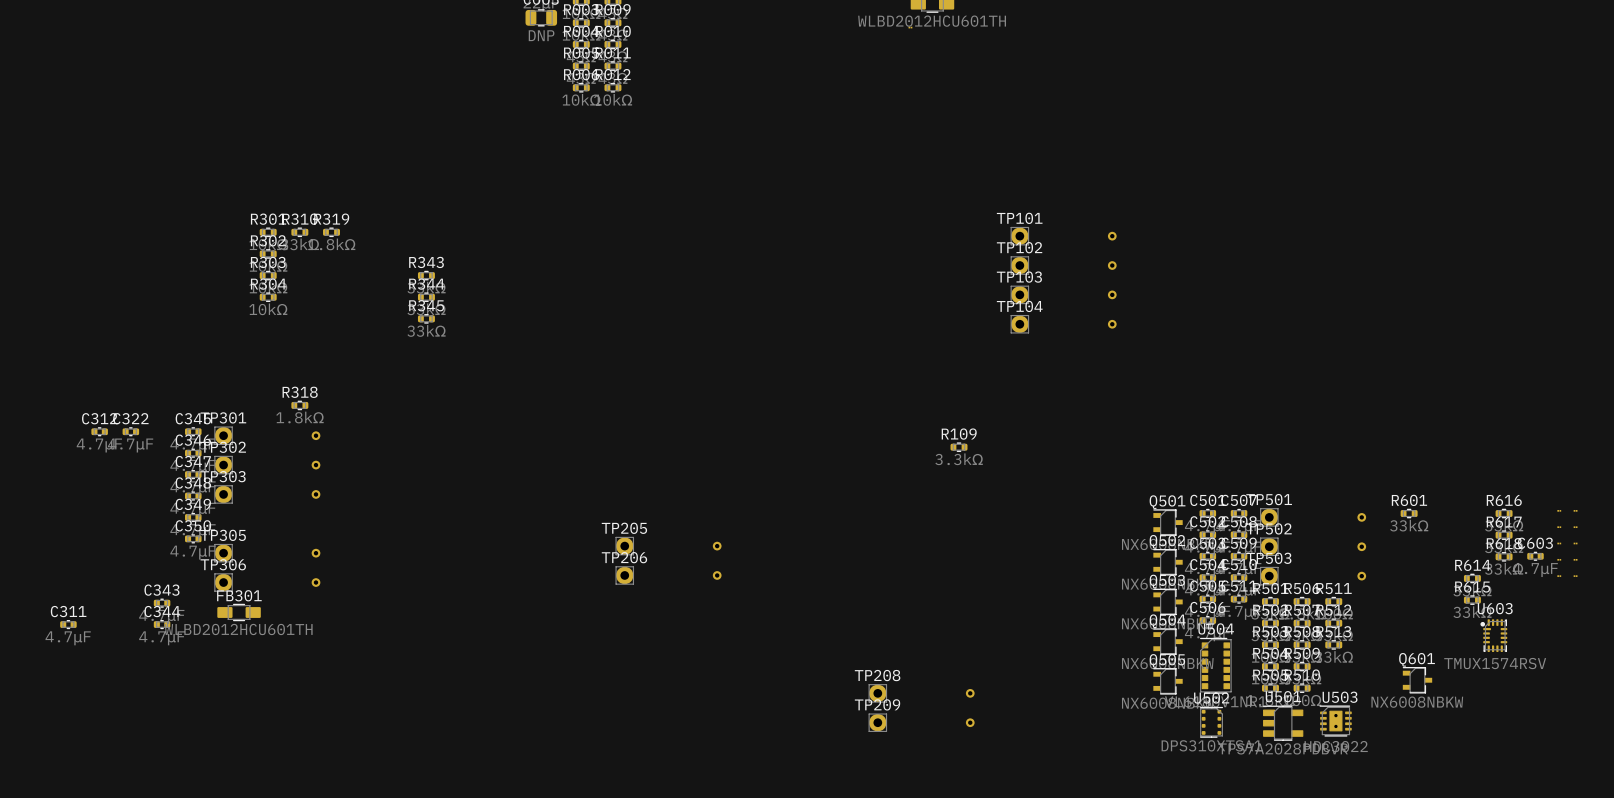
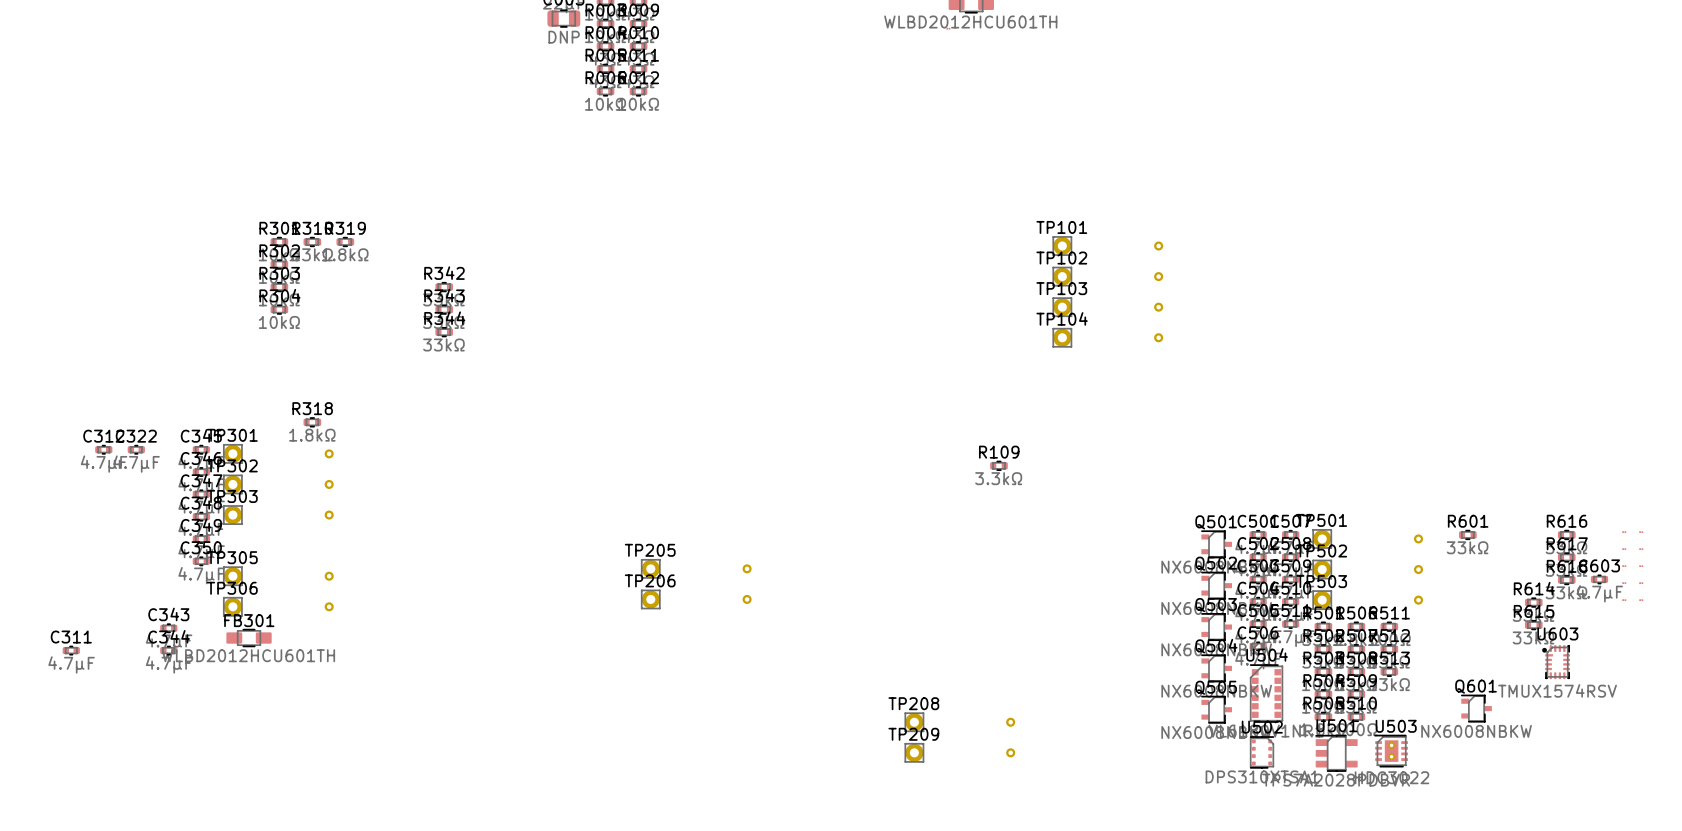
R343 name: R343 (426, 262) -> R342 (444, 273)
R344 name: R344 (426, 284) -> R343 (444, 295)
R345 name: R345 (426, 305) -> R344 (444, 318)

